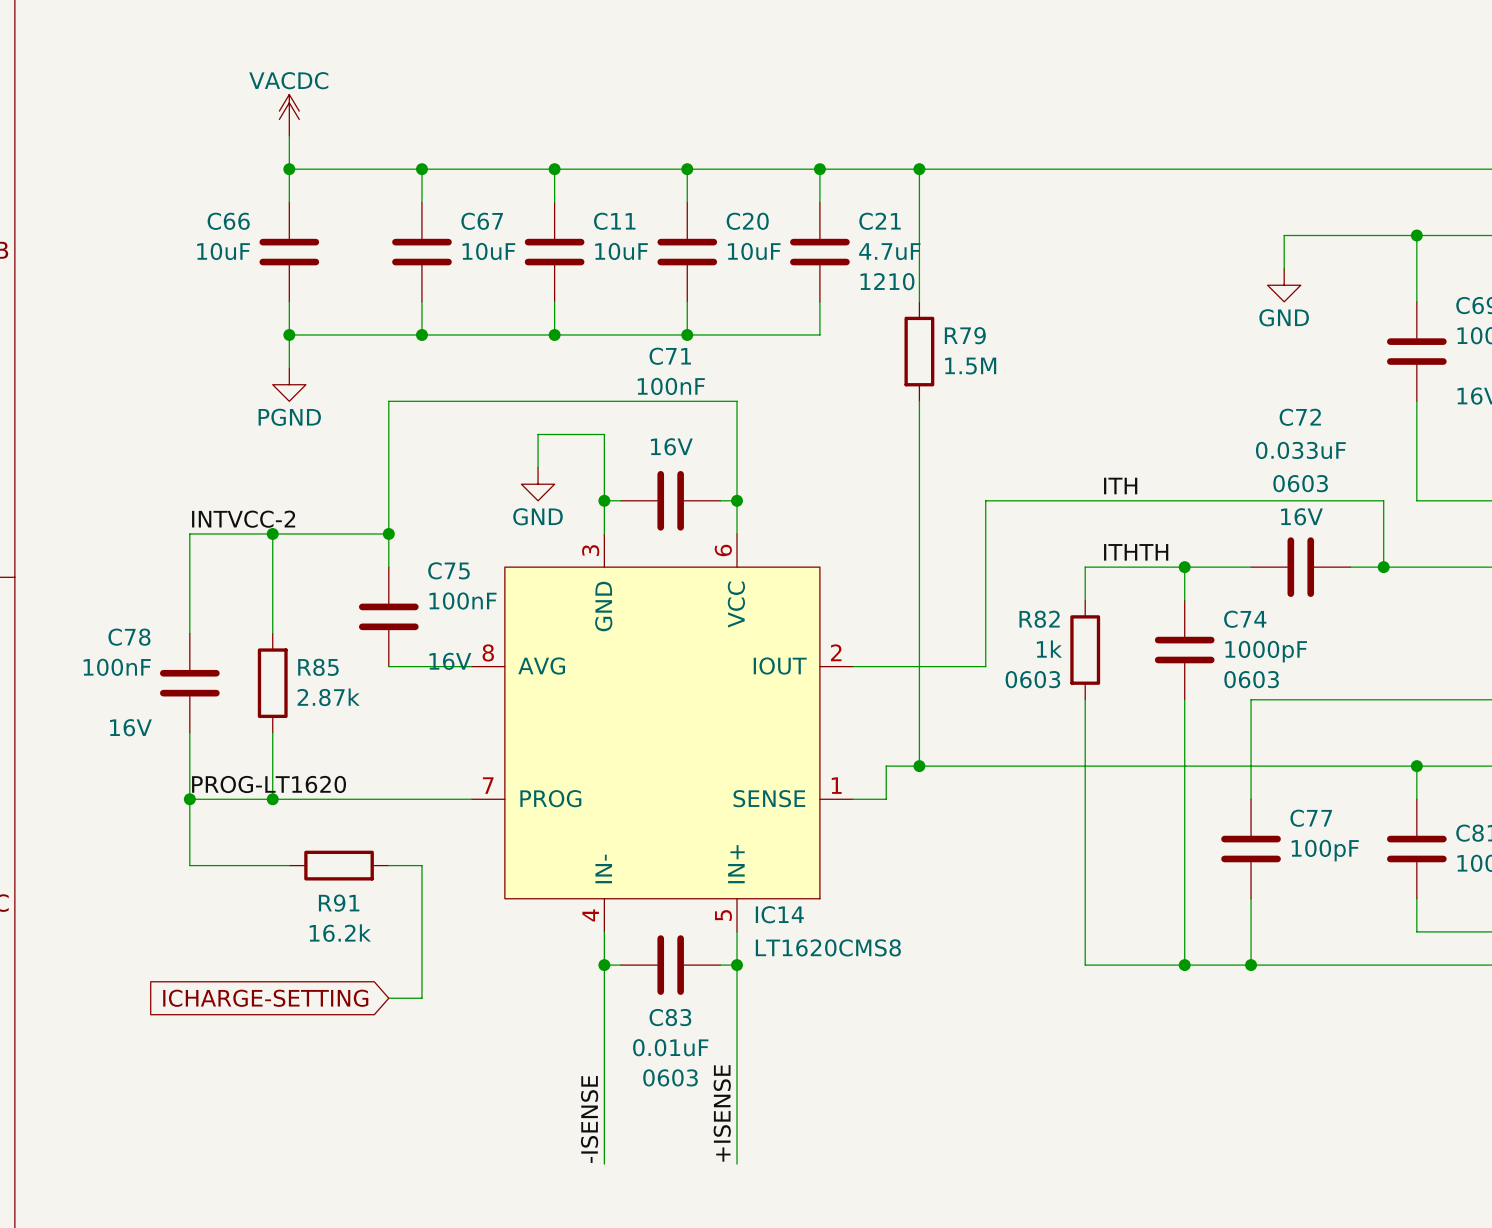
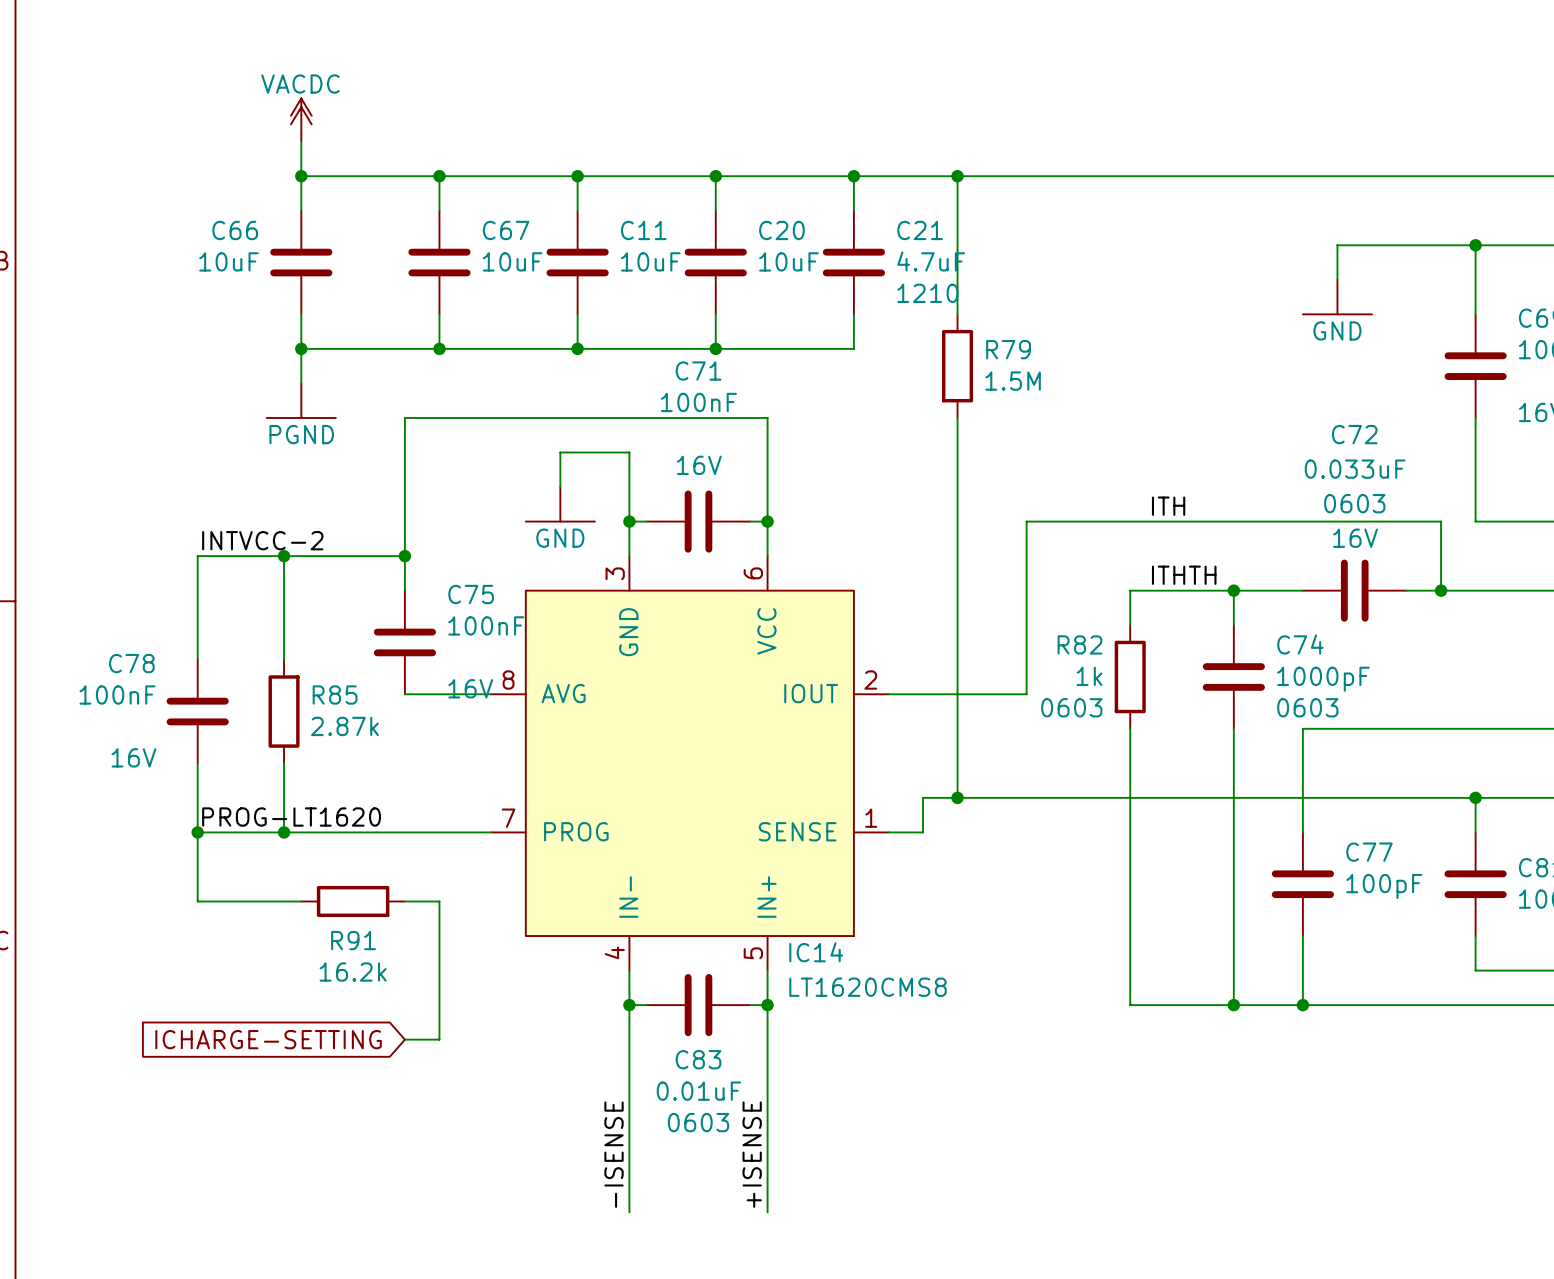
power symbol shape: [1267, 268, 1301, 302] -> [1302, 279, 1372, 315]
power symbol shape: [272, 368, 306, 402] -> [266, 383, 336, 418]
power symbol shape: [521, 467, 555, 501] -> [525, 487, 595, 522]

